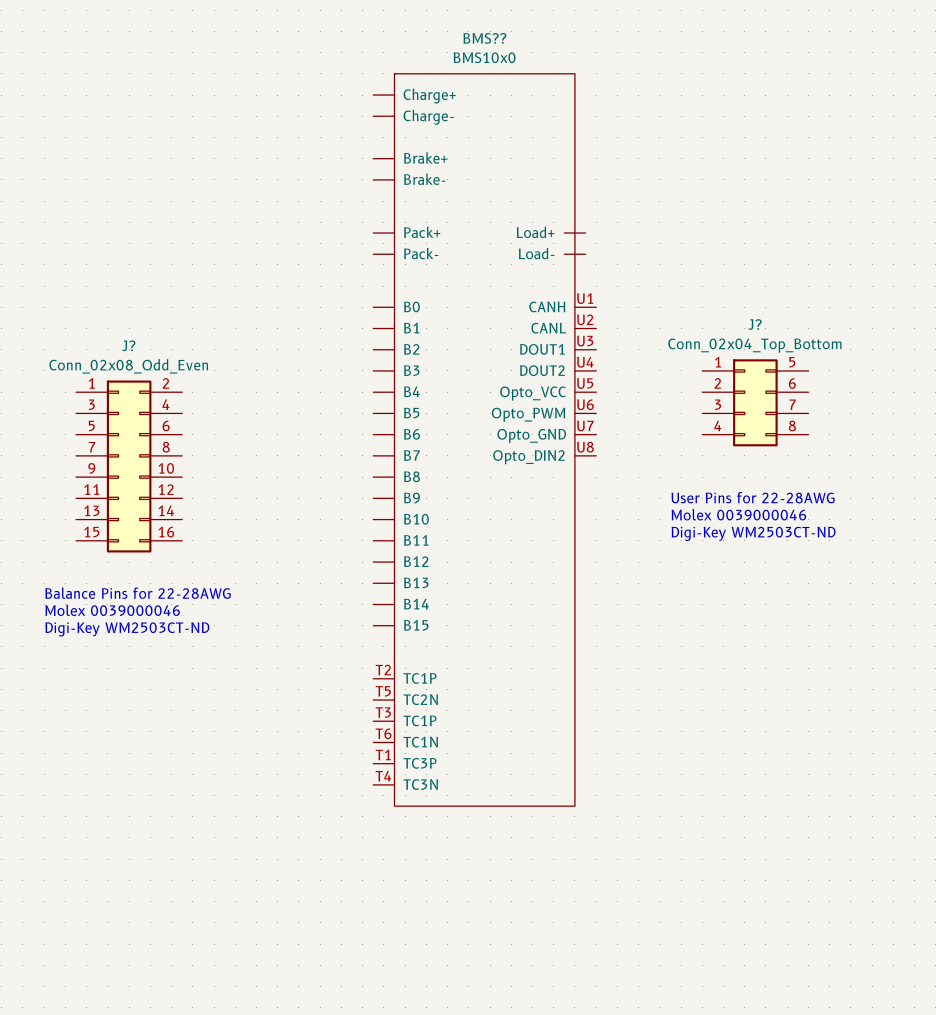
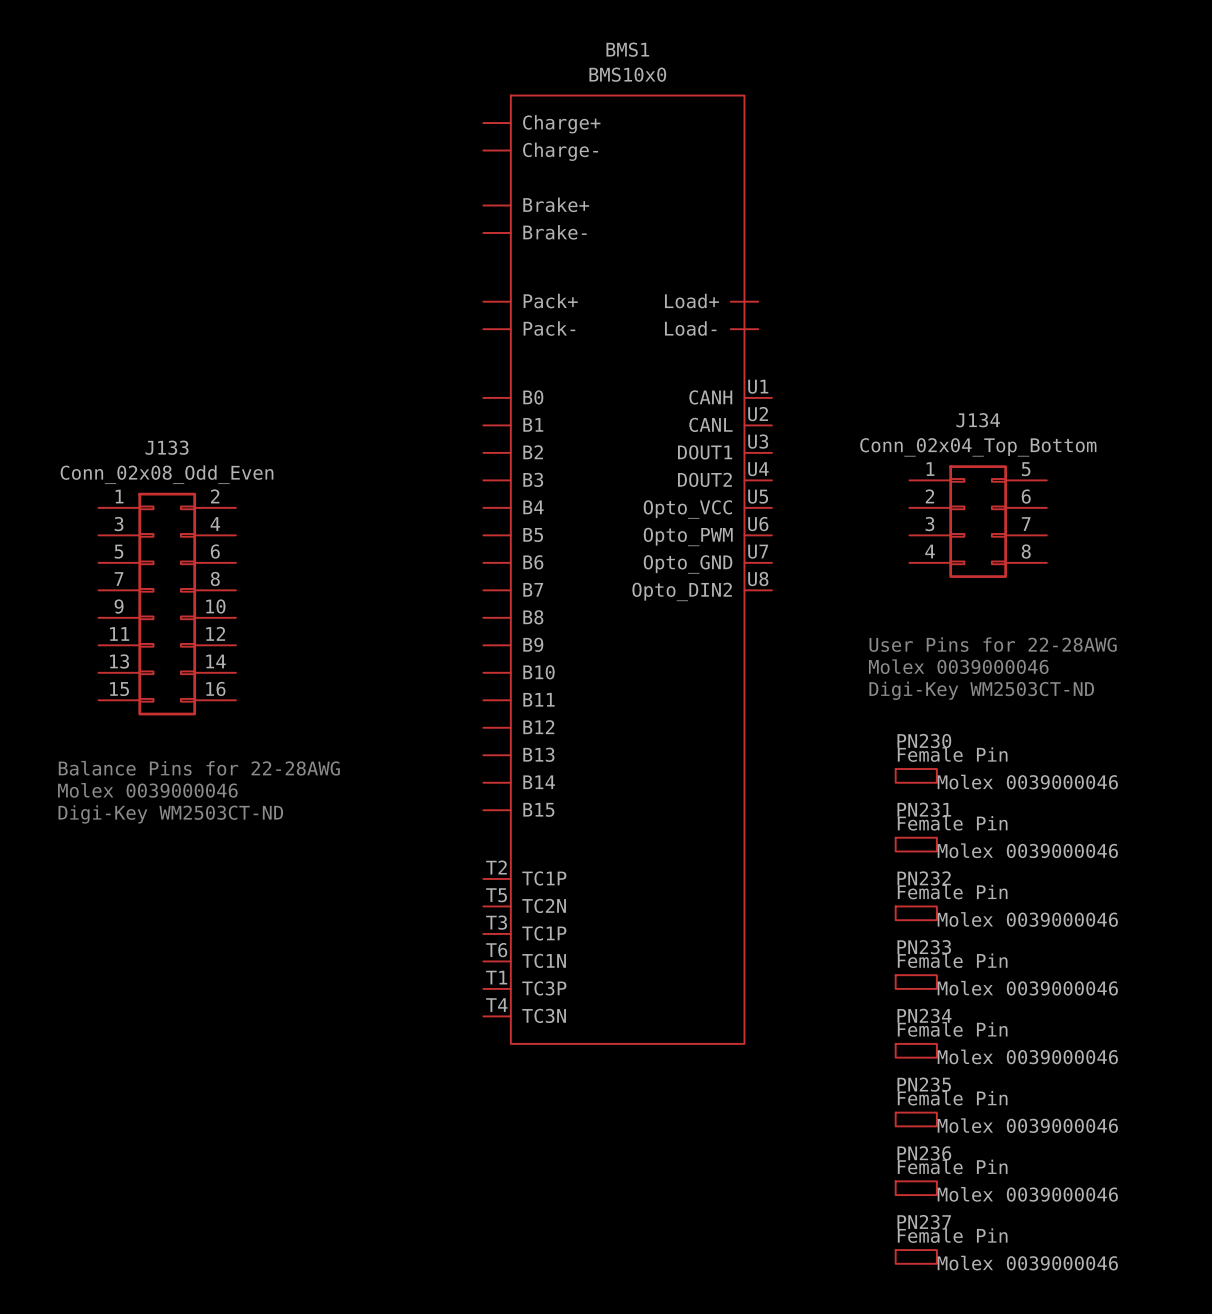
BMS?? name: BMS?? (484, 38) -> BMS1 (627, 49)
J? name: J? (755, 324) -> J134 (978, 420)
J? name: J? (128, 345) -> J133 (167, 447)
PN230: none -> Female Pin (916, 775)
PN231: none -> Female Pin (916, 844)
PN232: none -> Female Pin (916, 913)
PN233: none -> Female Pin (916, 982)
PN234: none -> Female Pin (916, 1050)
PN235: none -> Female Pin (916, 1119)
PN236: none -> Female Pin (916, 1188)
PN237: none -> Female Pin (916, 1256)

